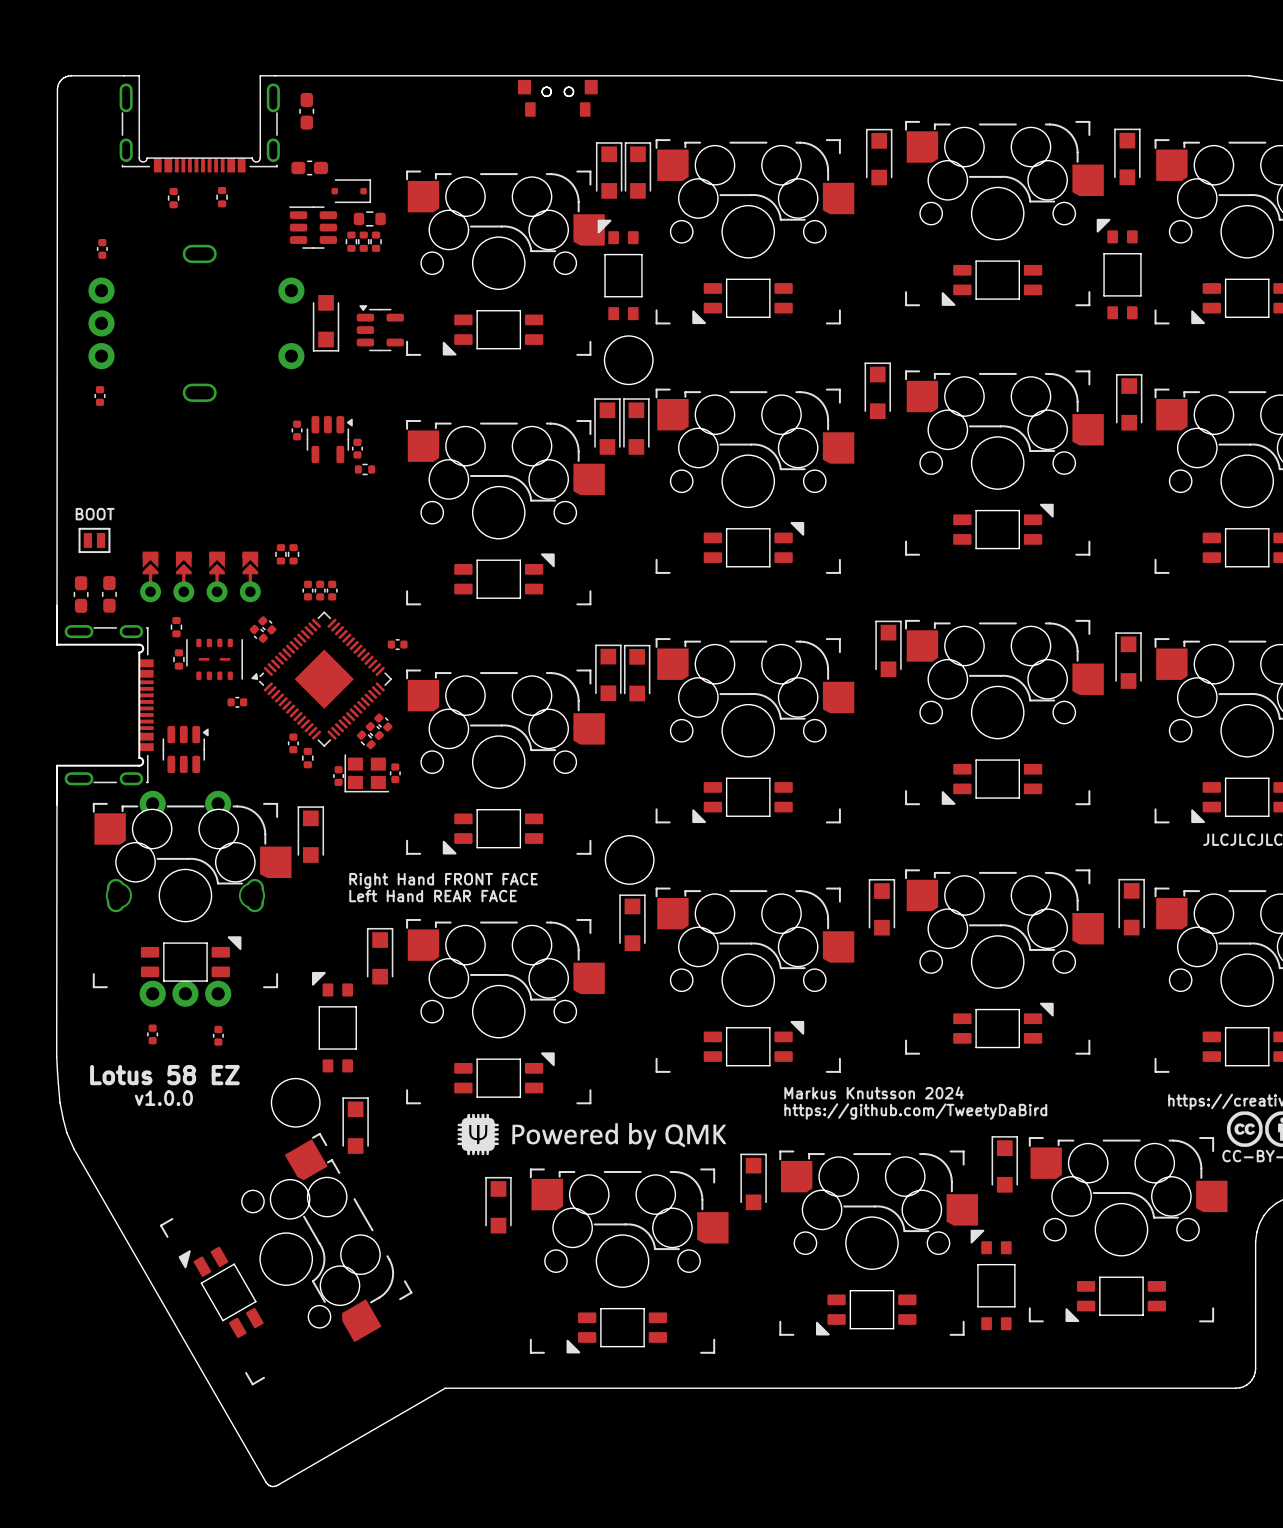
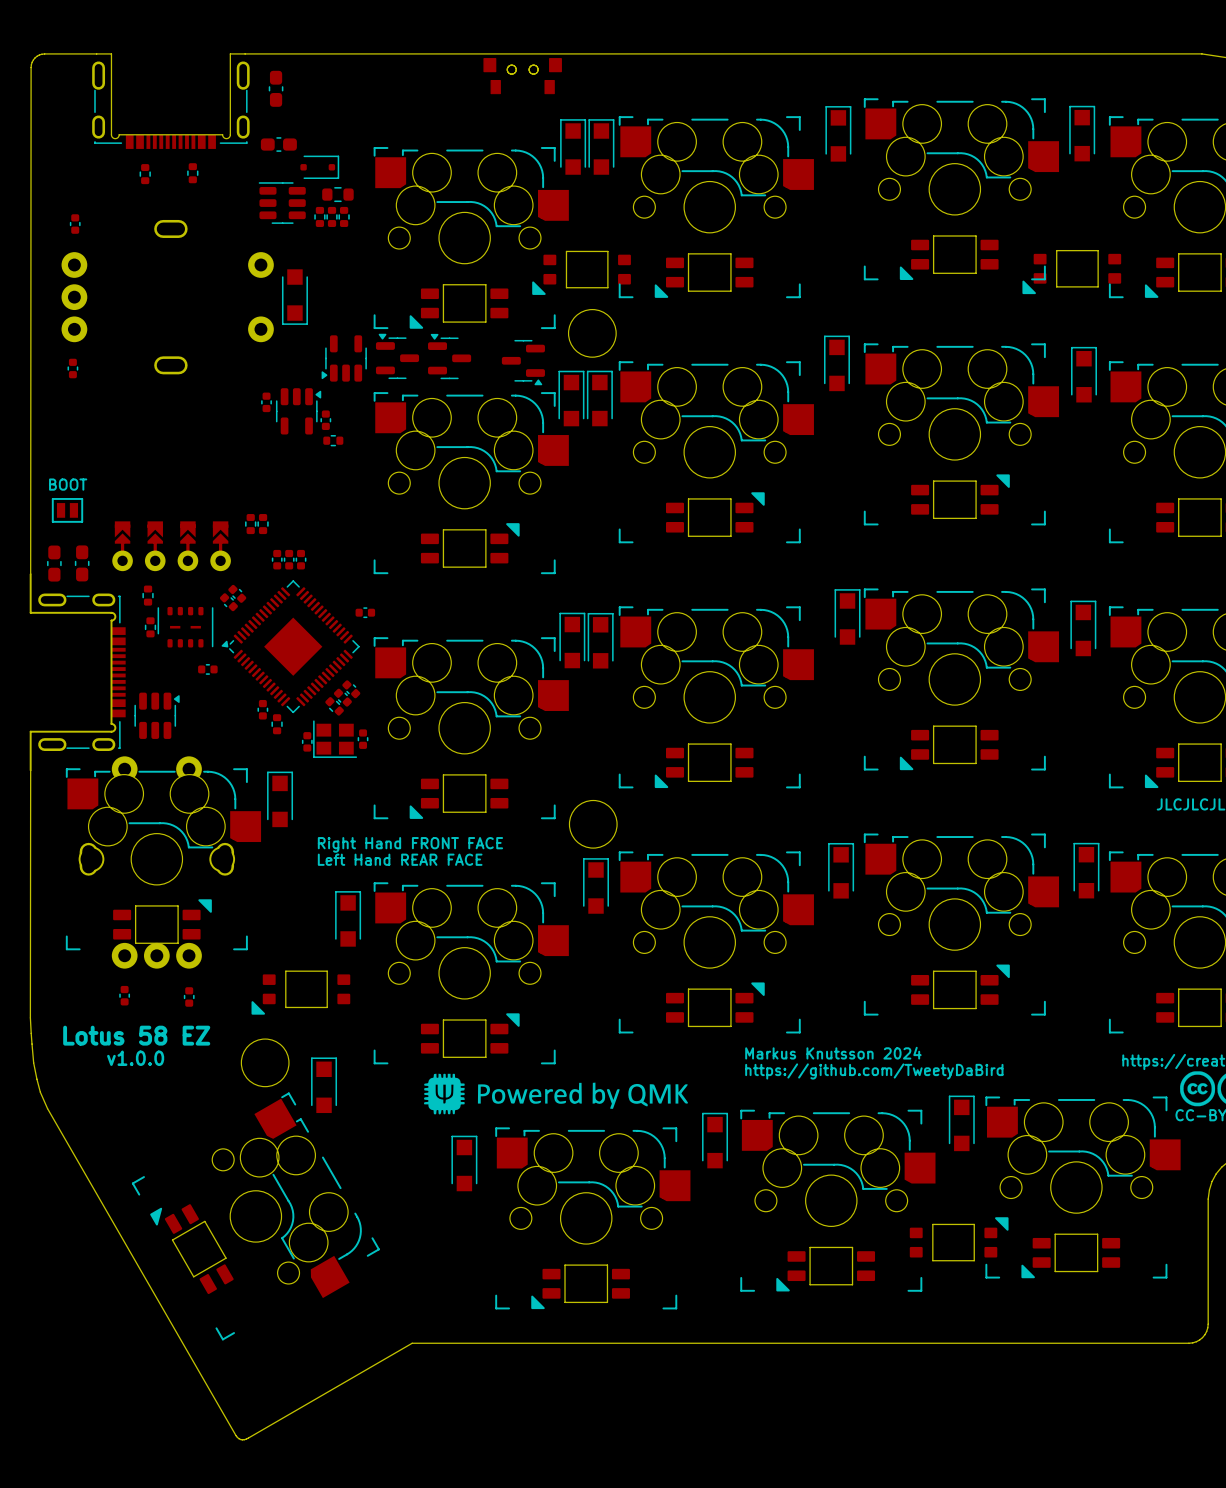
part rotation: 0° (620, 269) -> 90° counterclockwise (581, 272)
part rotation: 0° (1119, 269) -> 90° counterclockwise (1071, 272)
part rotation: 0° (380, 328) -> 90° counterclockwise (344, 358)
part position: (380, 328) -> (344, 358)
part: none -> (397, 356)
part: none -> (449, 356)
part: none -> (523, 362)
part rotation: 0° (334, 1022) -> 90° counterclockwise (300, 992)
part rotation: 0° (993, 1280) -> 90° clockwise (959, 1239)

